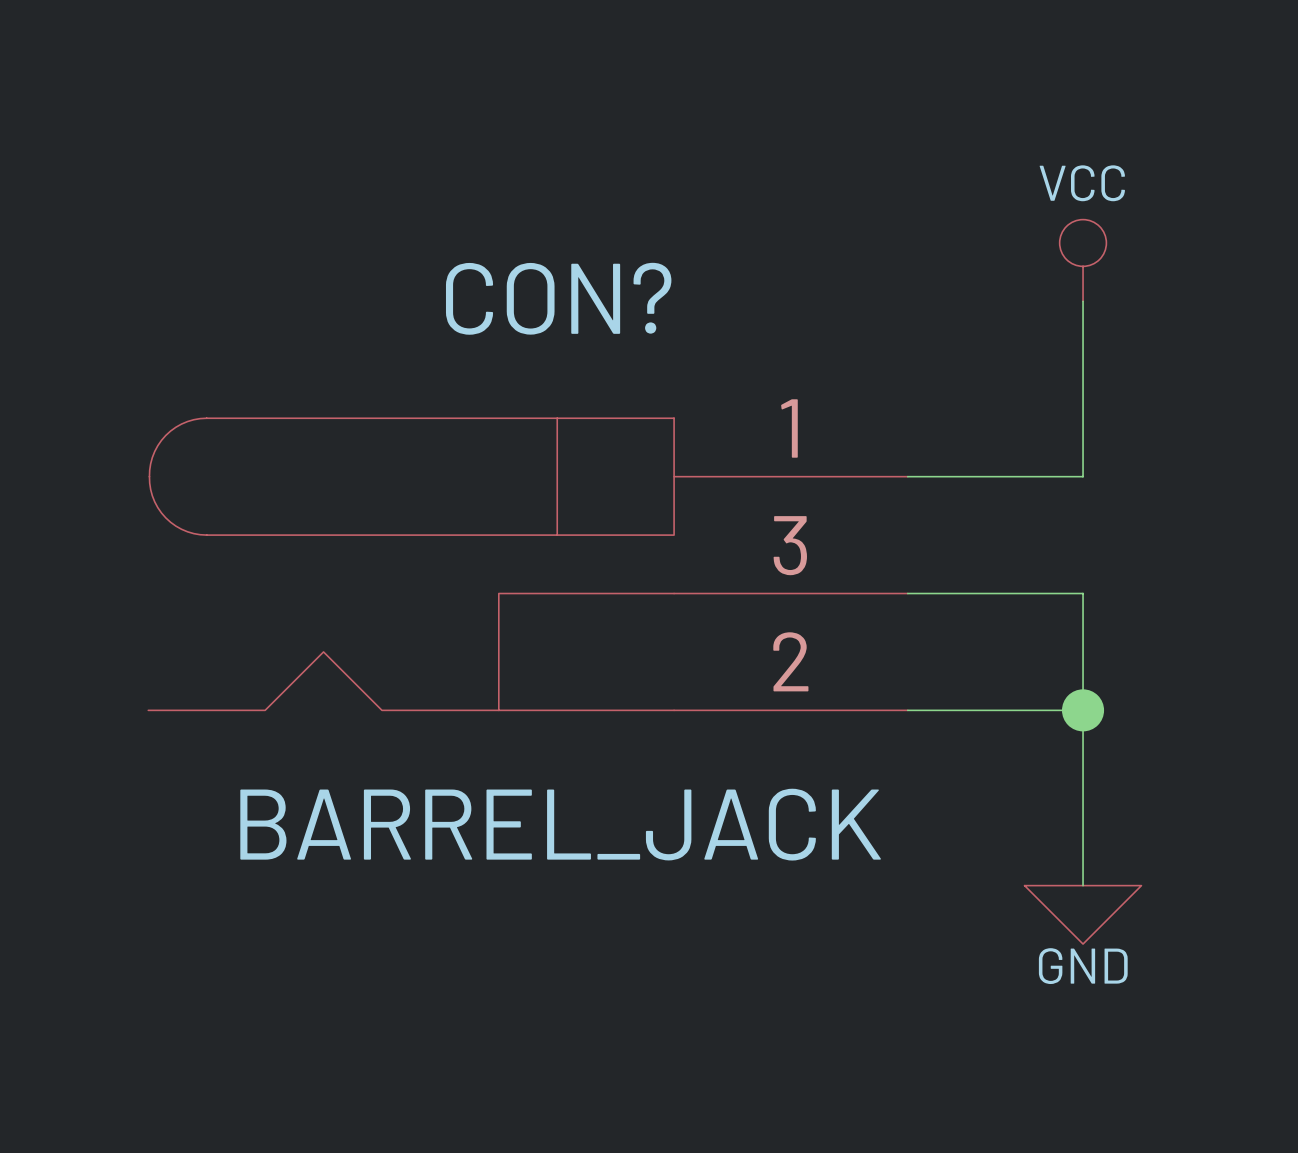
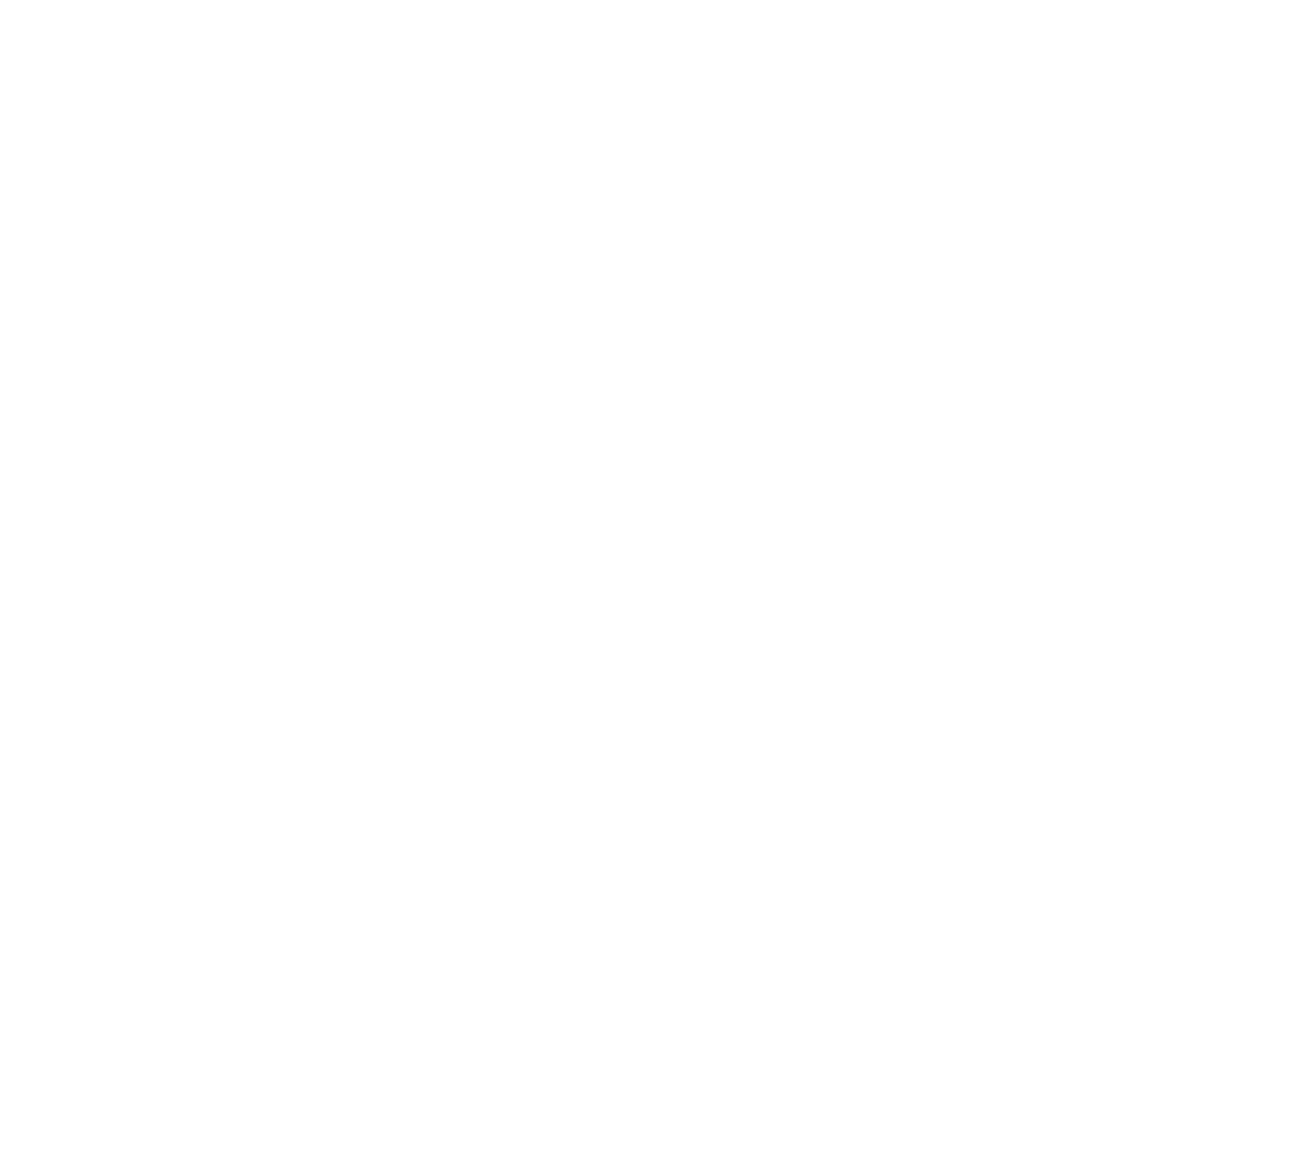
power symbol: VCC (1083, 260) -> none
wire: (1083, 301) (1083, 476) (907, 476) -> none
CON?: BARREL_JACK (528, 564) -> none
wire: (907, 593) (1083, 593) (1083, 885) -> none
wire: (907, 710) (1083, 710) -> none
junction: (1083, 710) -> none
power symbol: GND (1083, 914) -> none

